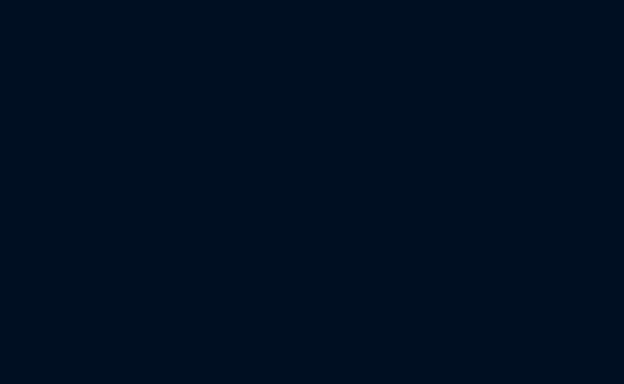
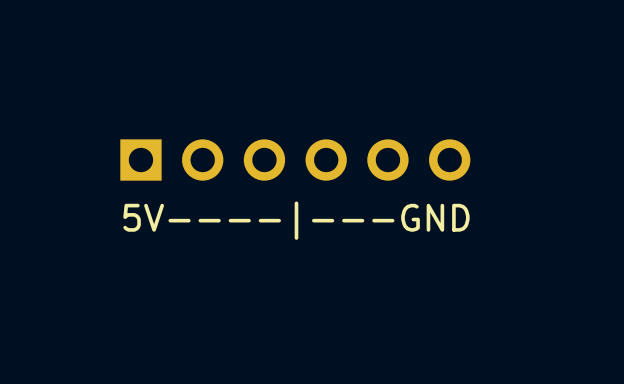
part: none -> (295, 160)
text: none -> 5V---- (202, 217)
text: none -> |---GND (382, 220)

